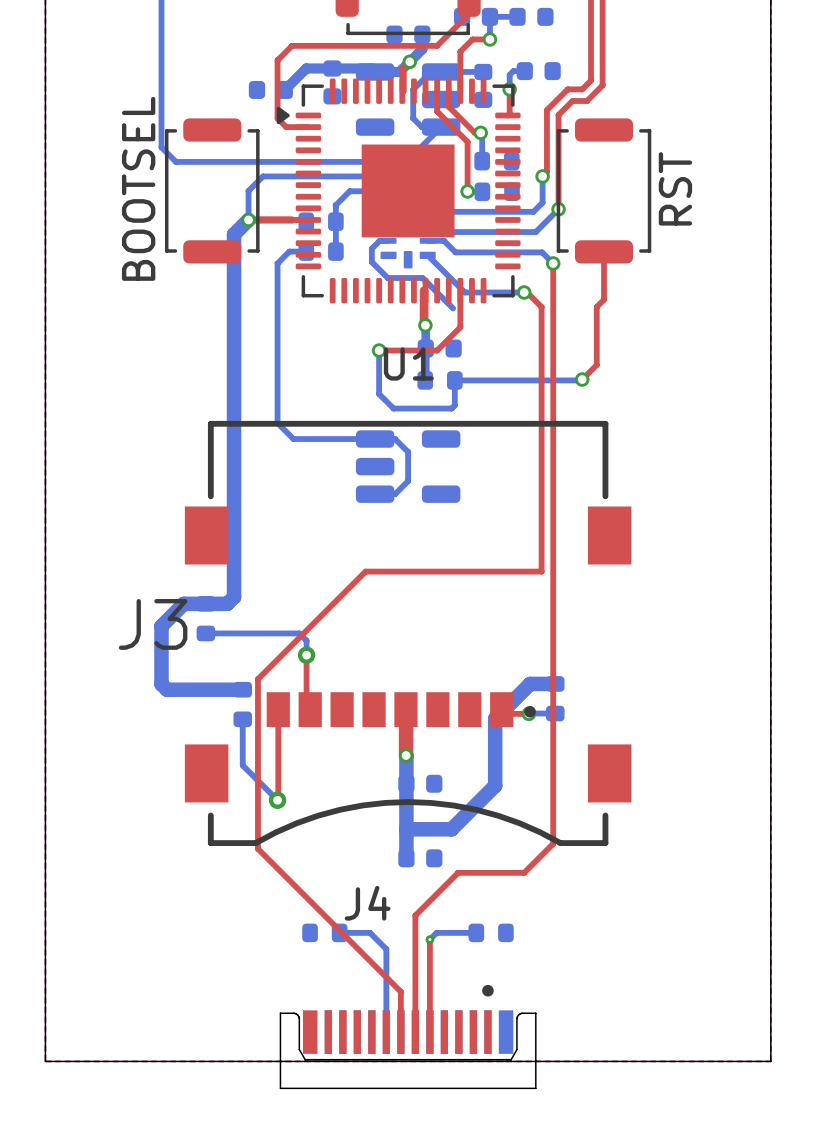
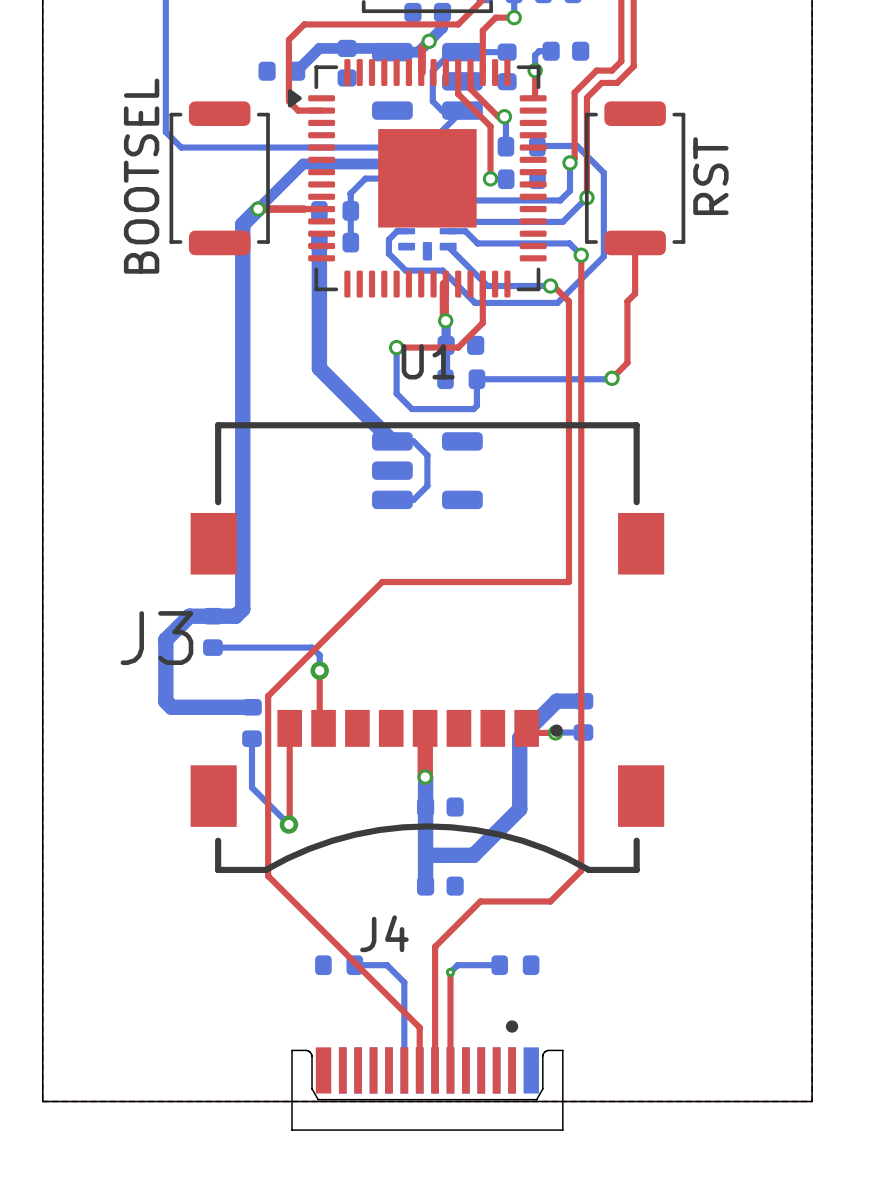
bottom track: none -> (537, 146) (577, 145) (603, 172) (603, 256) (557, 302) (475, 302)
bottom track: (408, 198) (408, 190) (393, 176) (263, 176) (248, 190) (248, 219) -> (427, 186) (404, 164) (303, 164) (258, 209)
bottom track: (306, 251) (289, 251) (277, 263) (277, 423) (293, 439) (375, 439) -> (319, 242) (319, 368) (392, 441)

